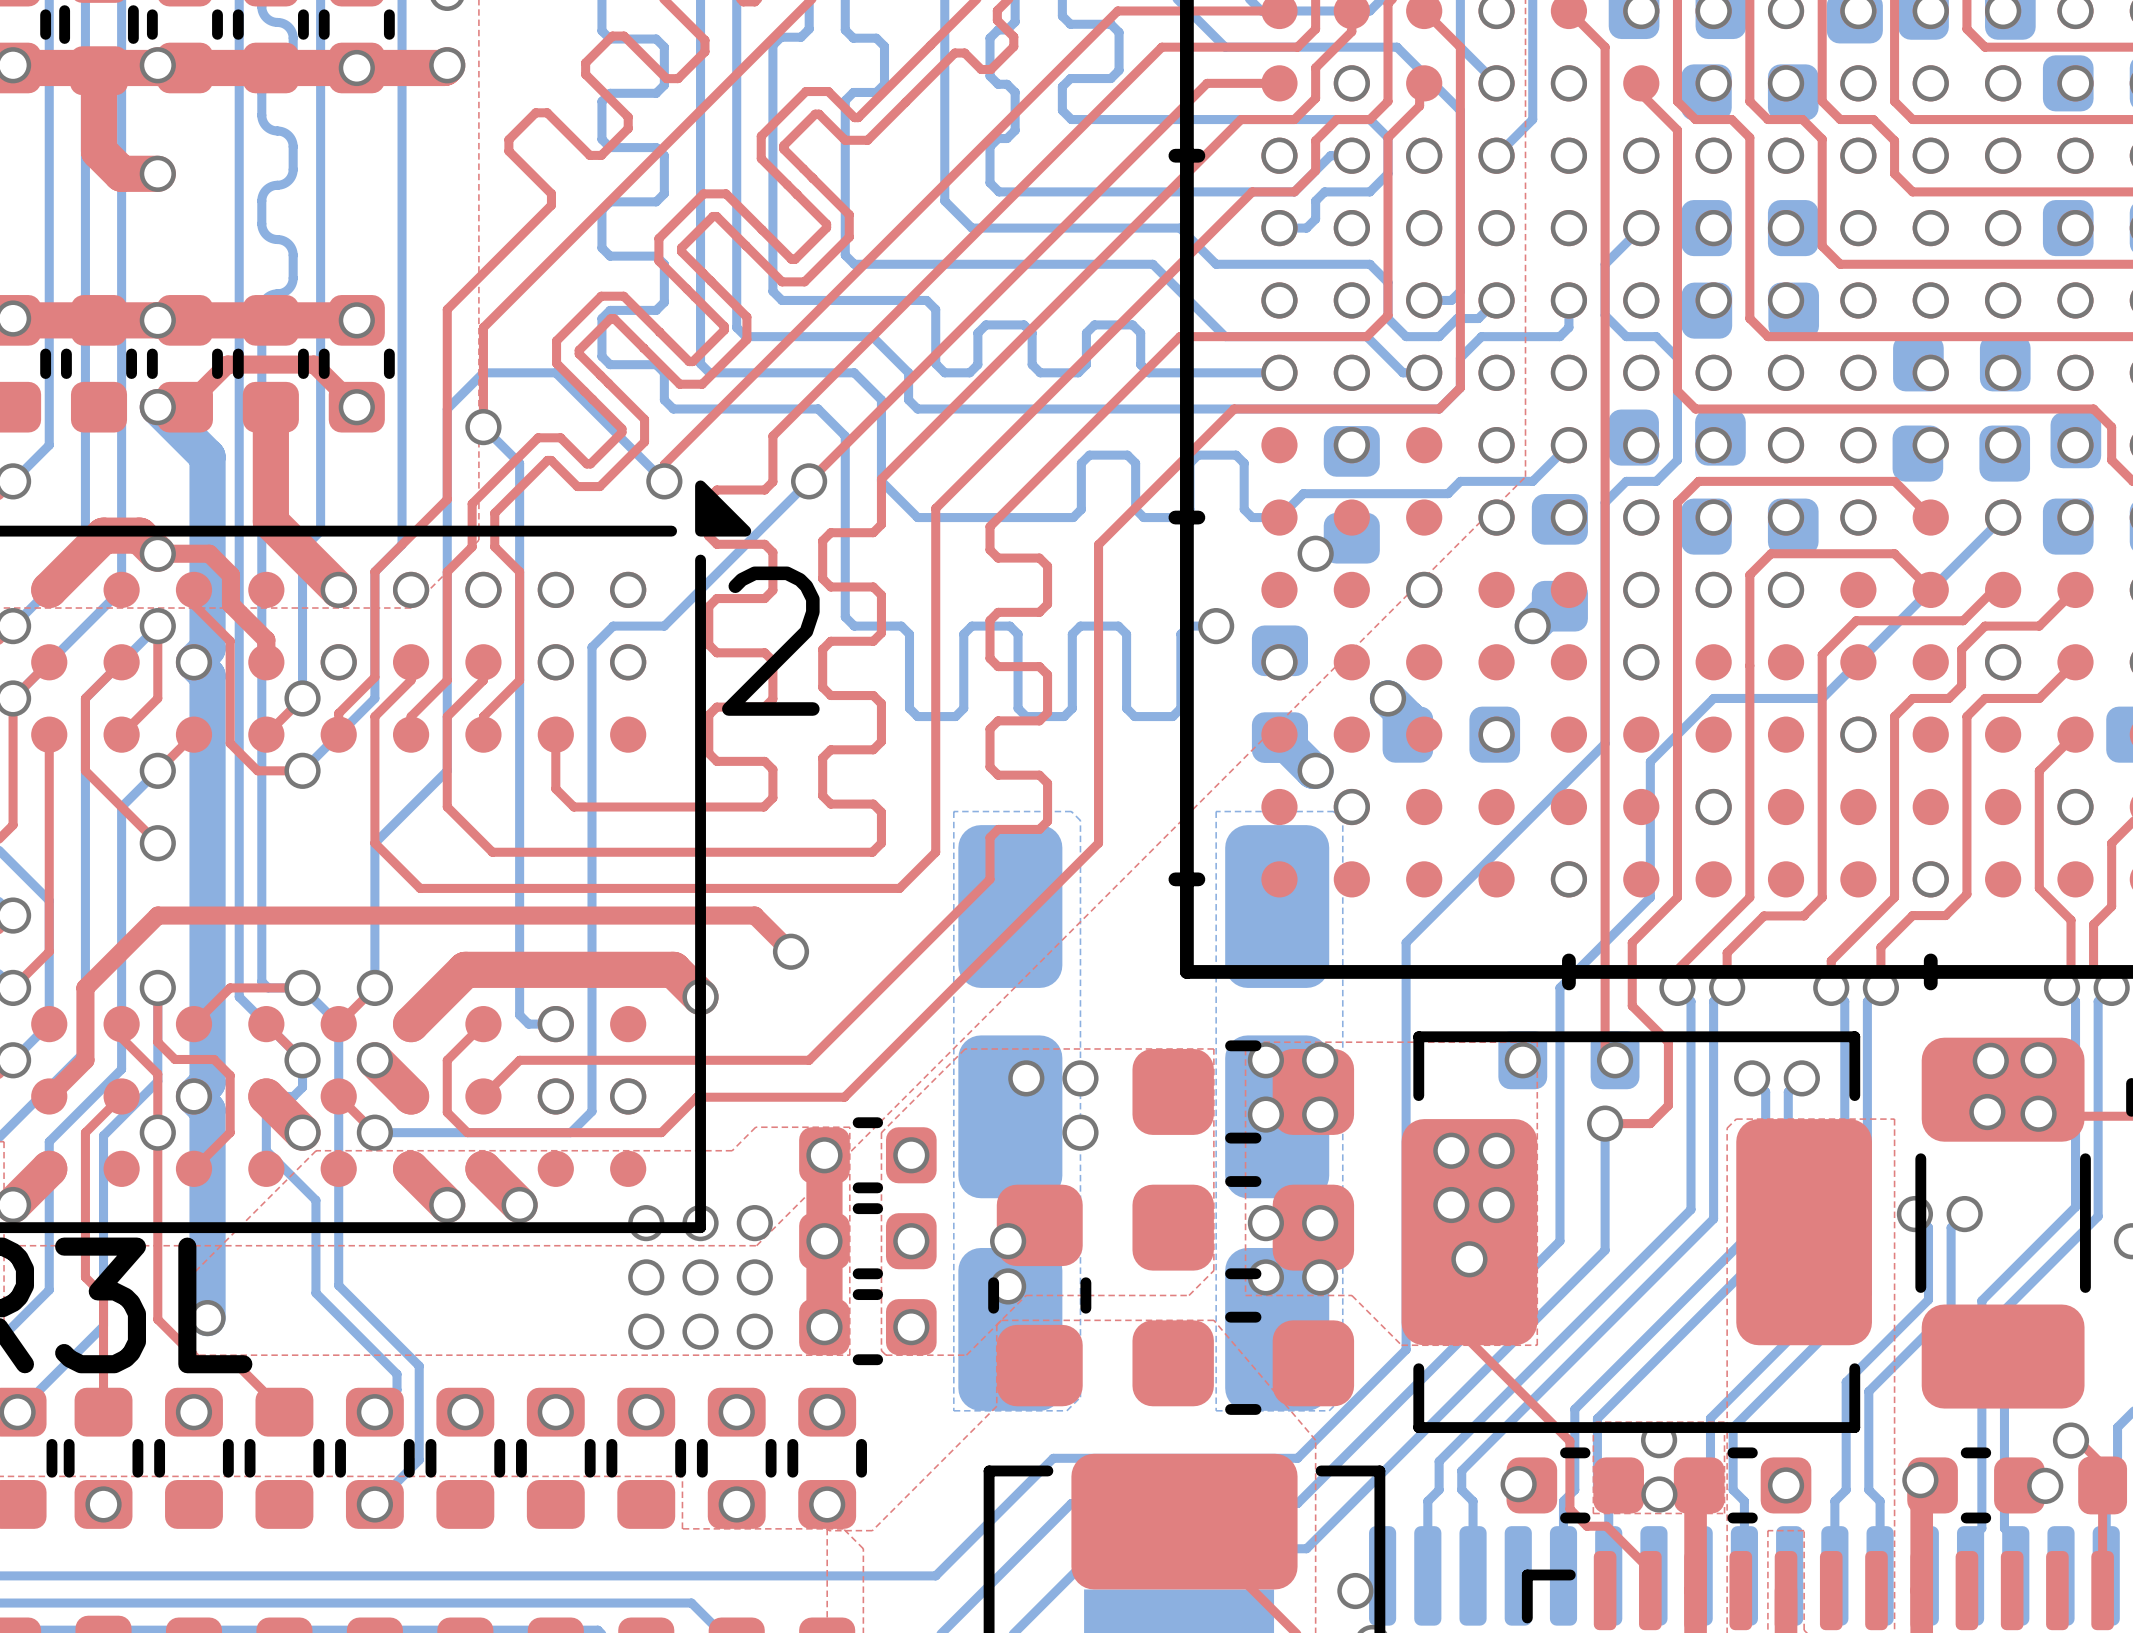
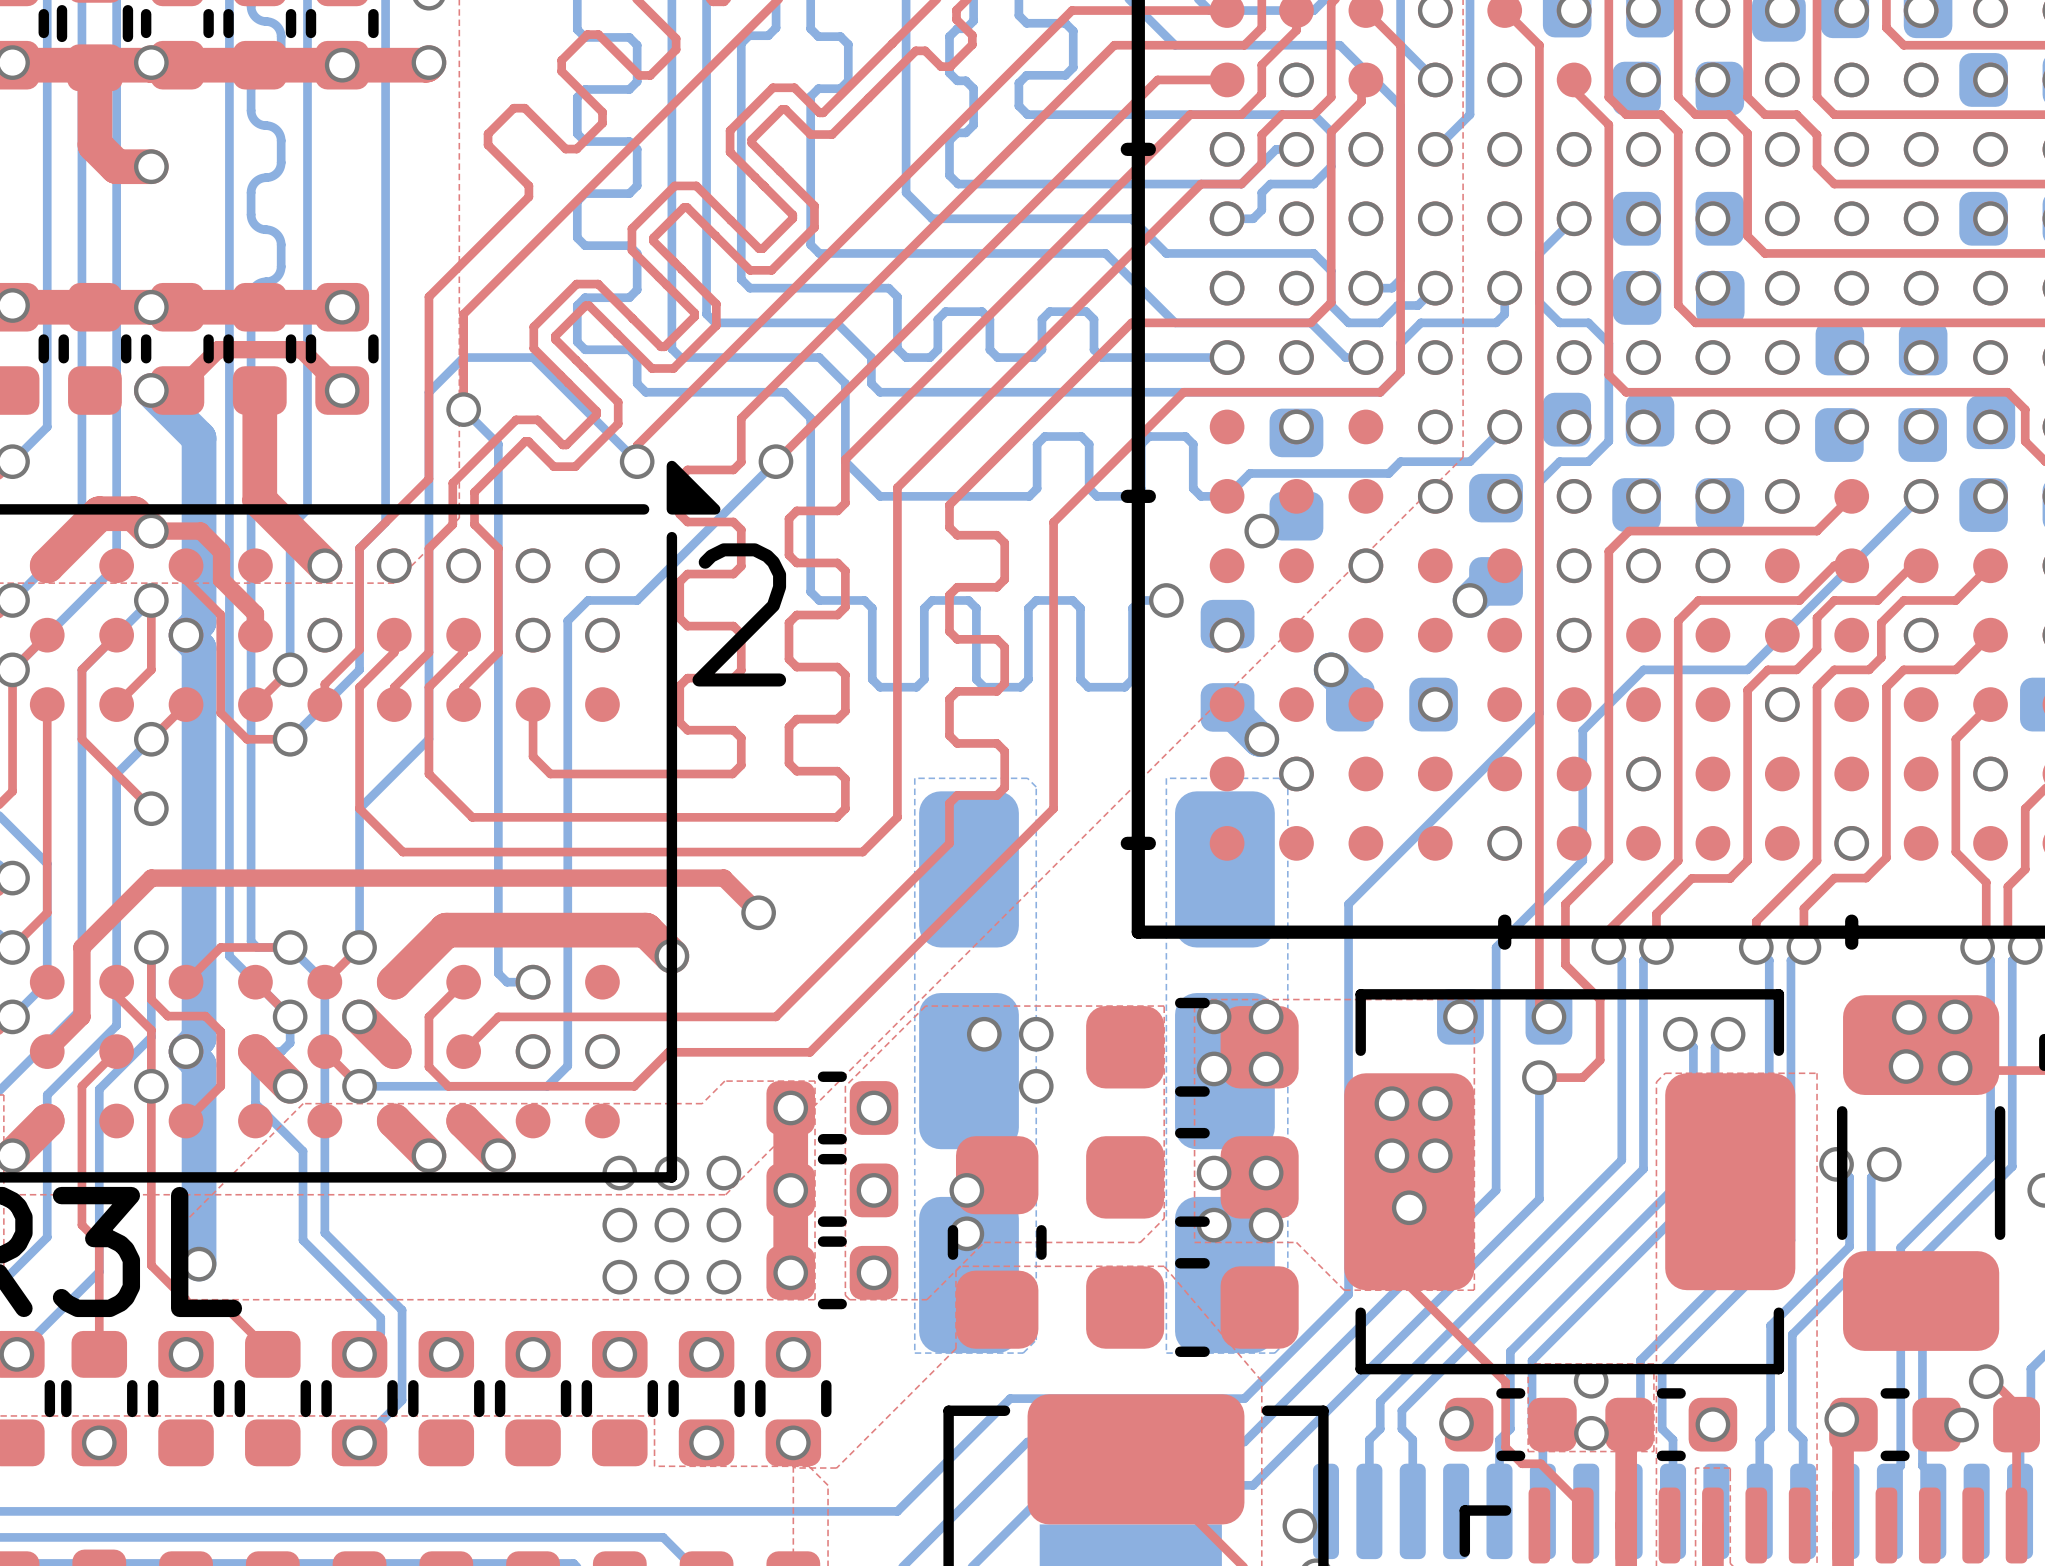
top track: (1930, 517) (1894, 481) (1698, 481) (1677, 502) (1677, 574) -> none
top track: (1771, 553) (1749, 574) (1749, 665) -> (1698, 531) (1629, 531) (1608, 551)
top track: (1894, 553) (1930, 589) -> (1817, 531) (1851, 496)
top track: none -> (1851, 565) (1834, 565) (1799, 600) (1698, 600) (1678, 620) (1678, 638)
top track: (1963, 620) (1856, 620) (1822, 654) (1822, 719) -> (1882, 595) (1877, 600) (1834, 600) (1817, 617) (1817, 649) (1796, 669) (1767, 669) (1747, 690)

